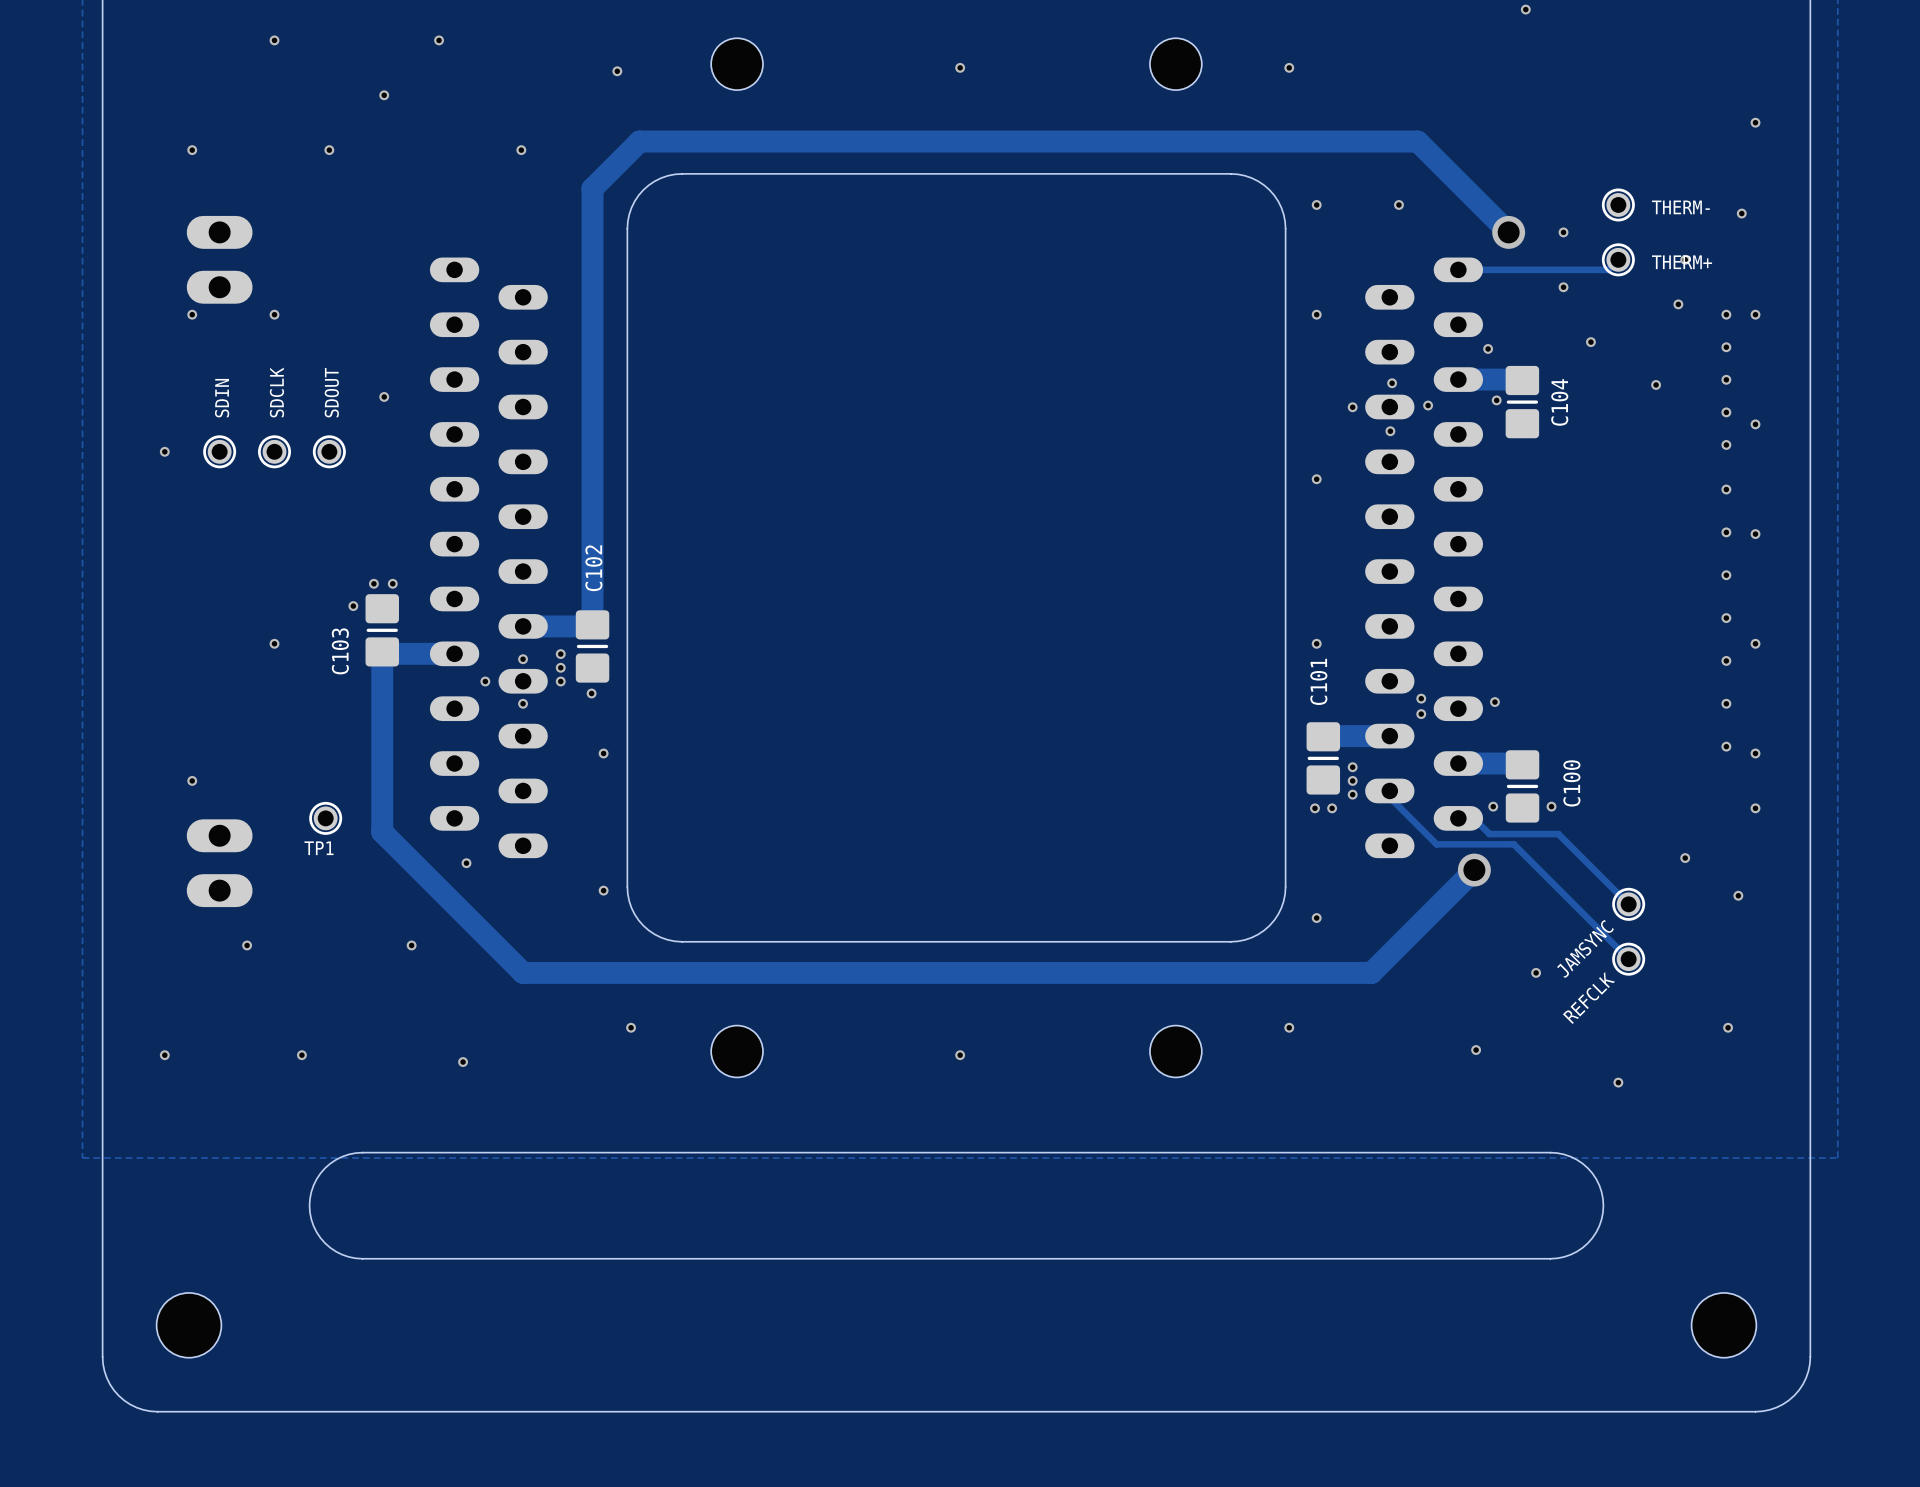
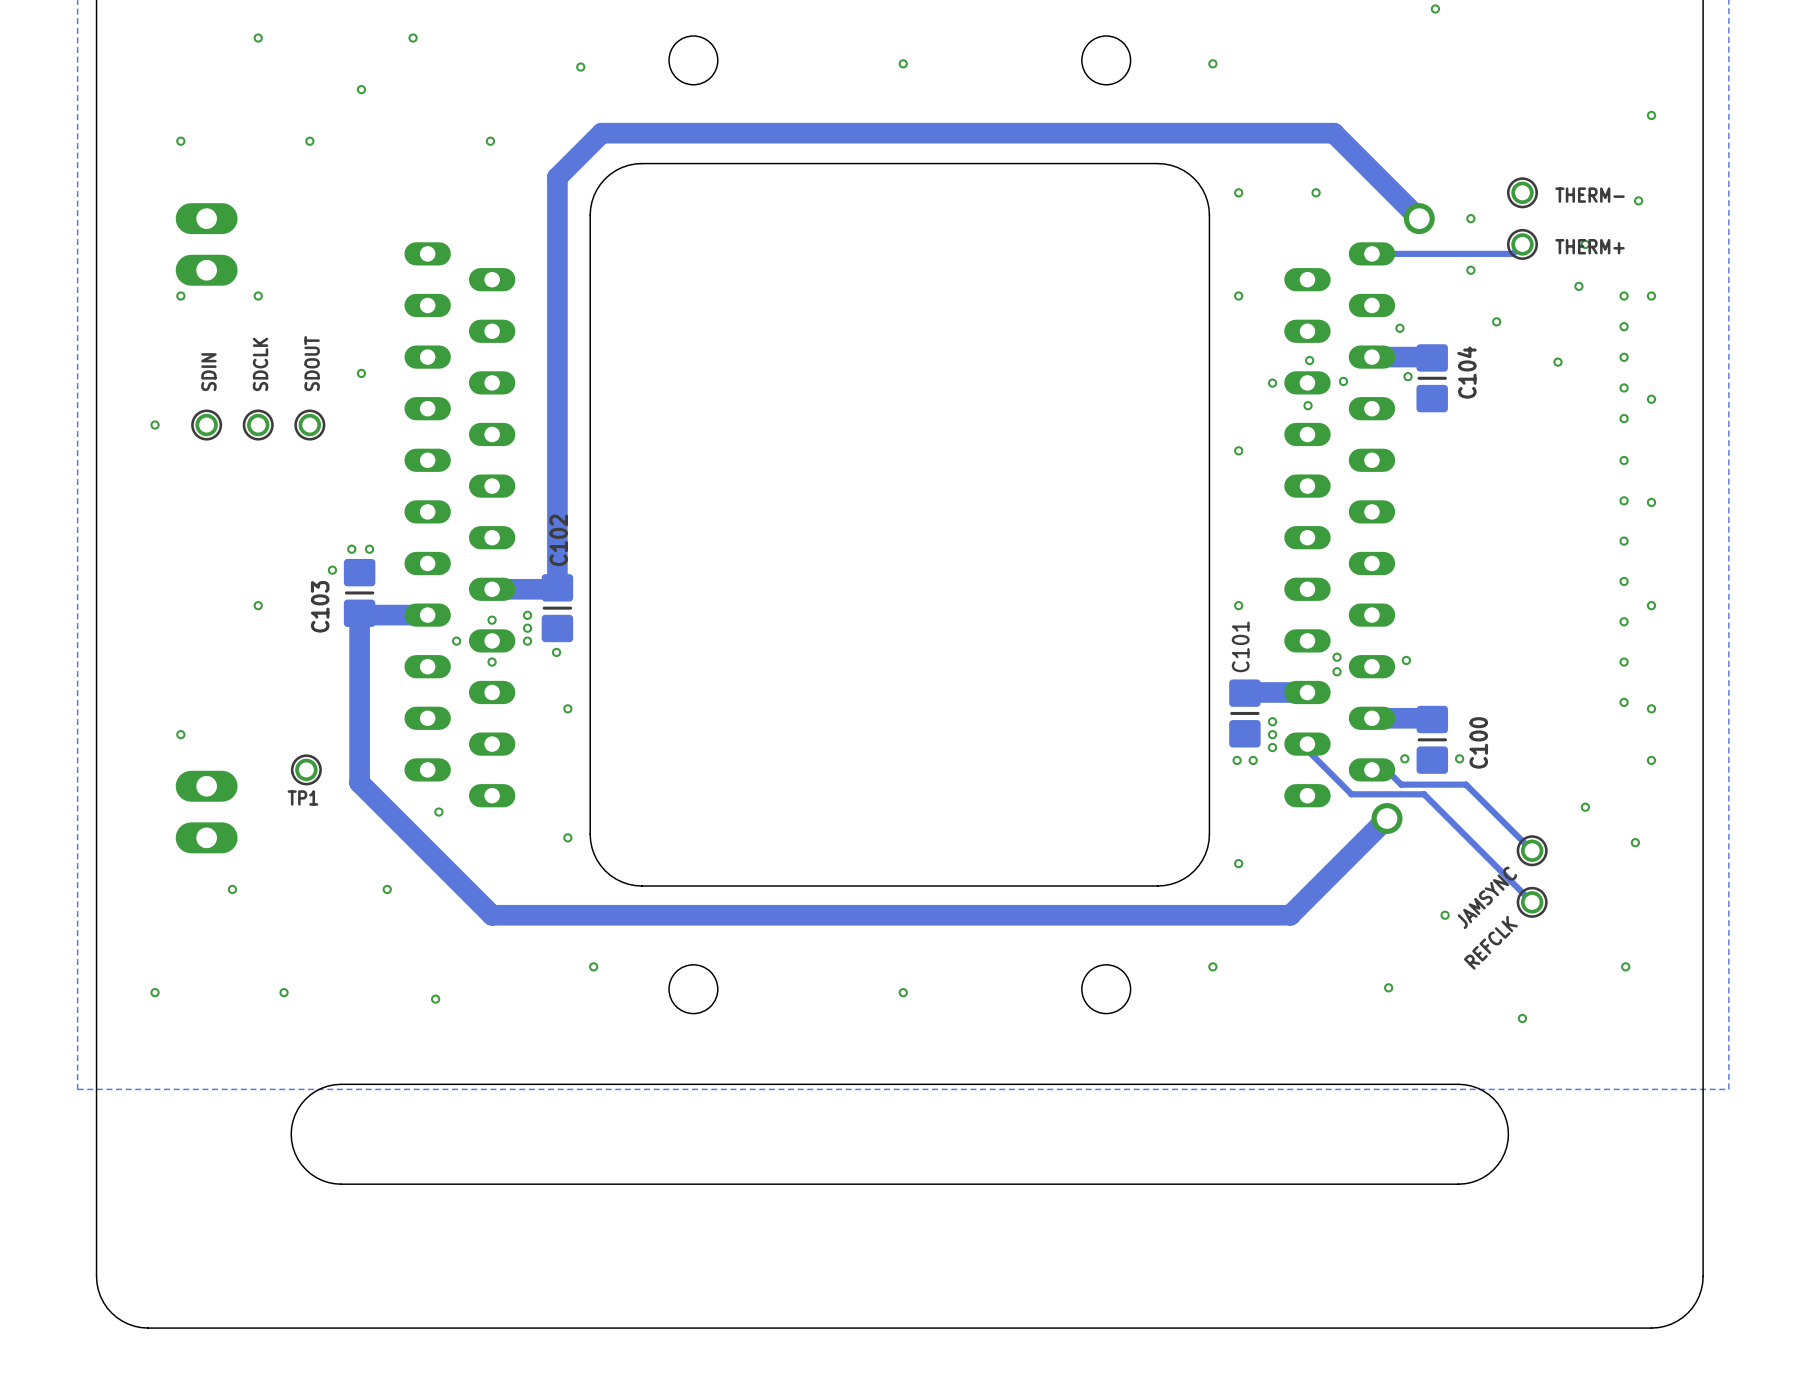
hole: (188, 1325) -> none
hole: (1723, 1325) -> none

